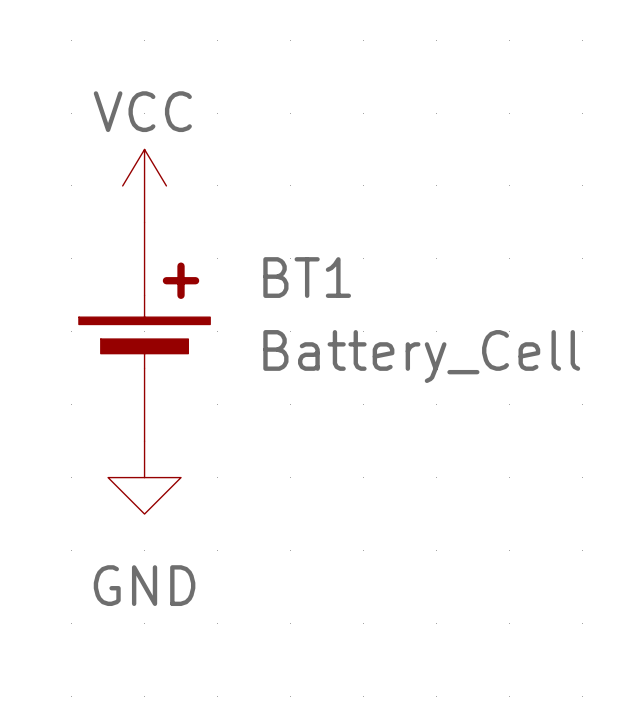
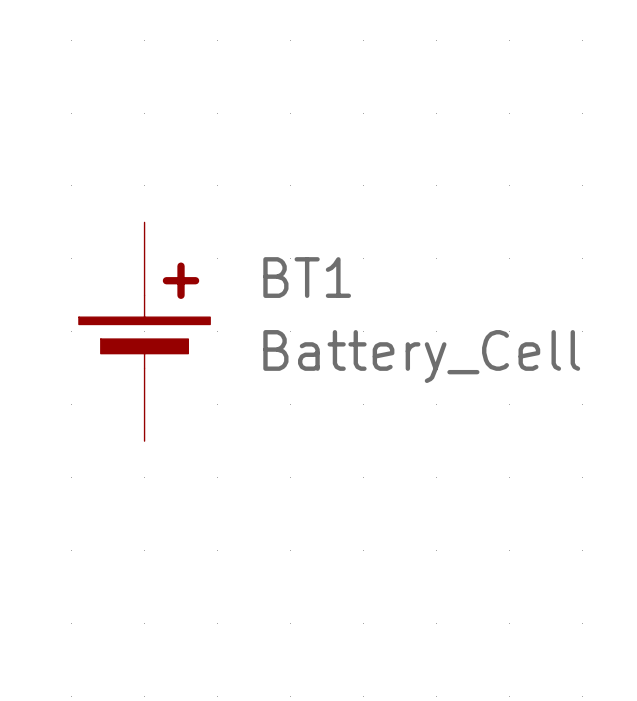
power symbol: VCC (144, 185) -> none
power symbol: GND (144, 477) -> none

